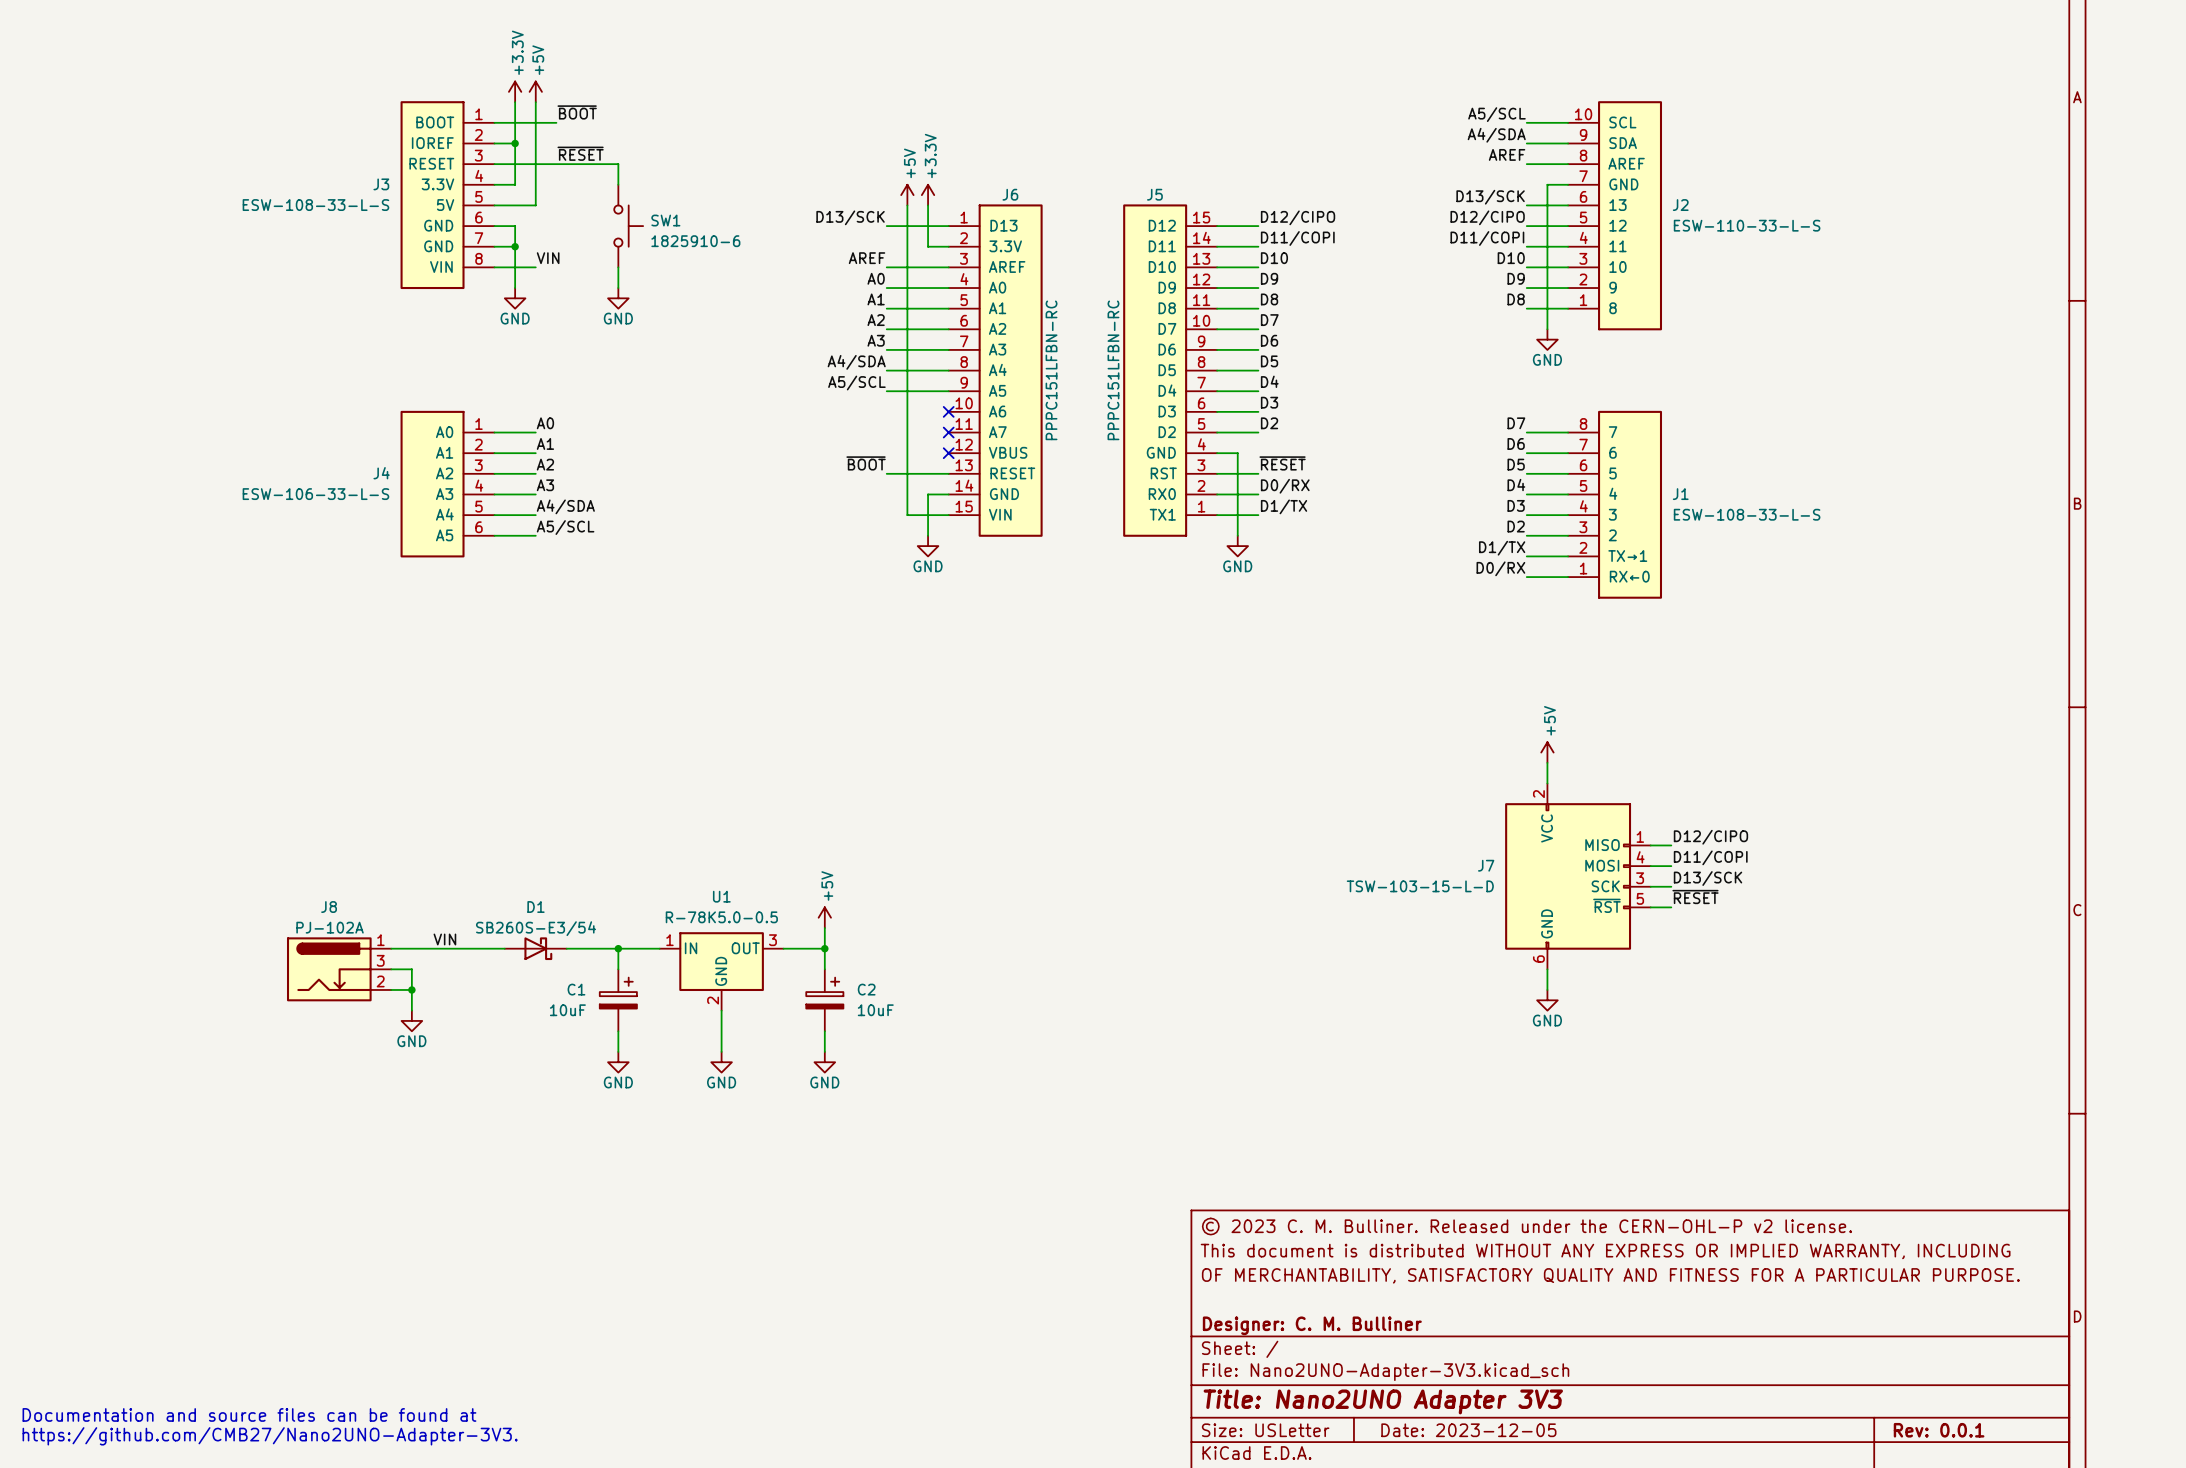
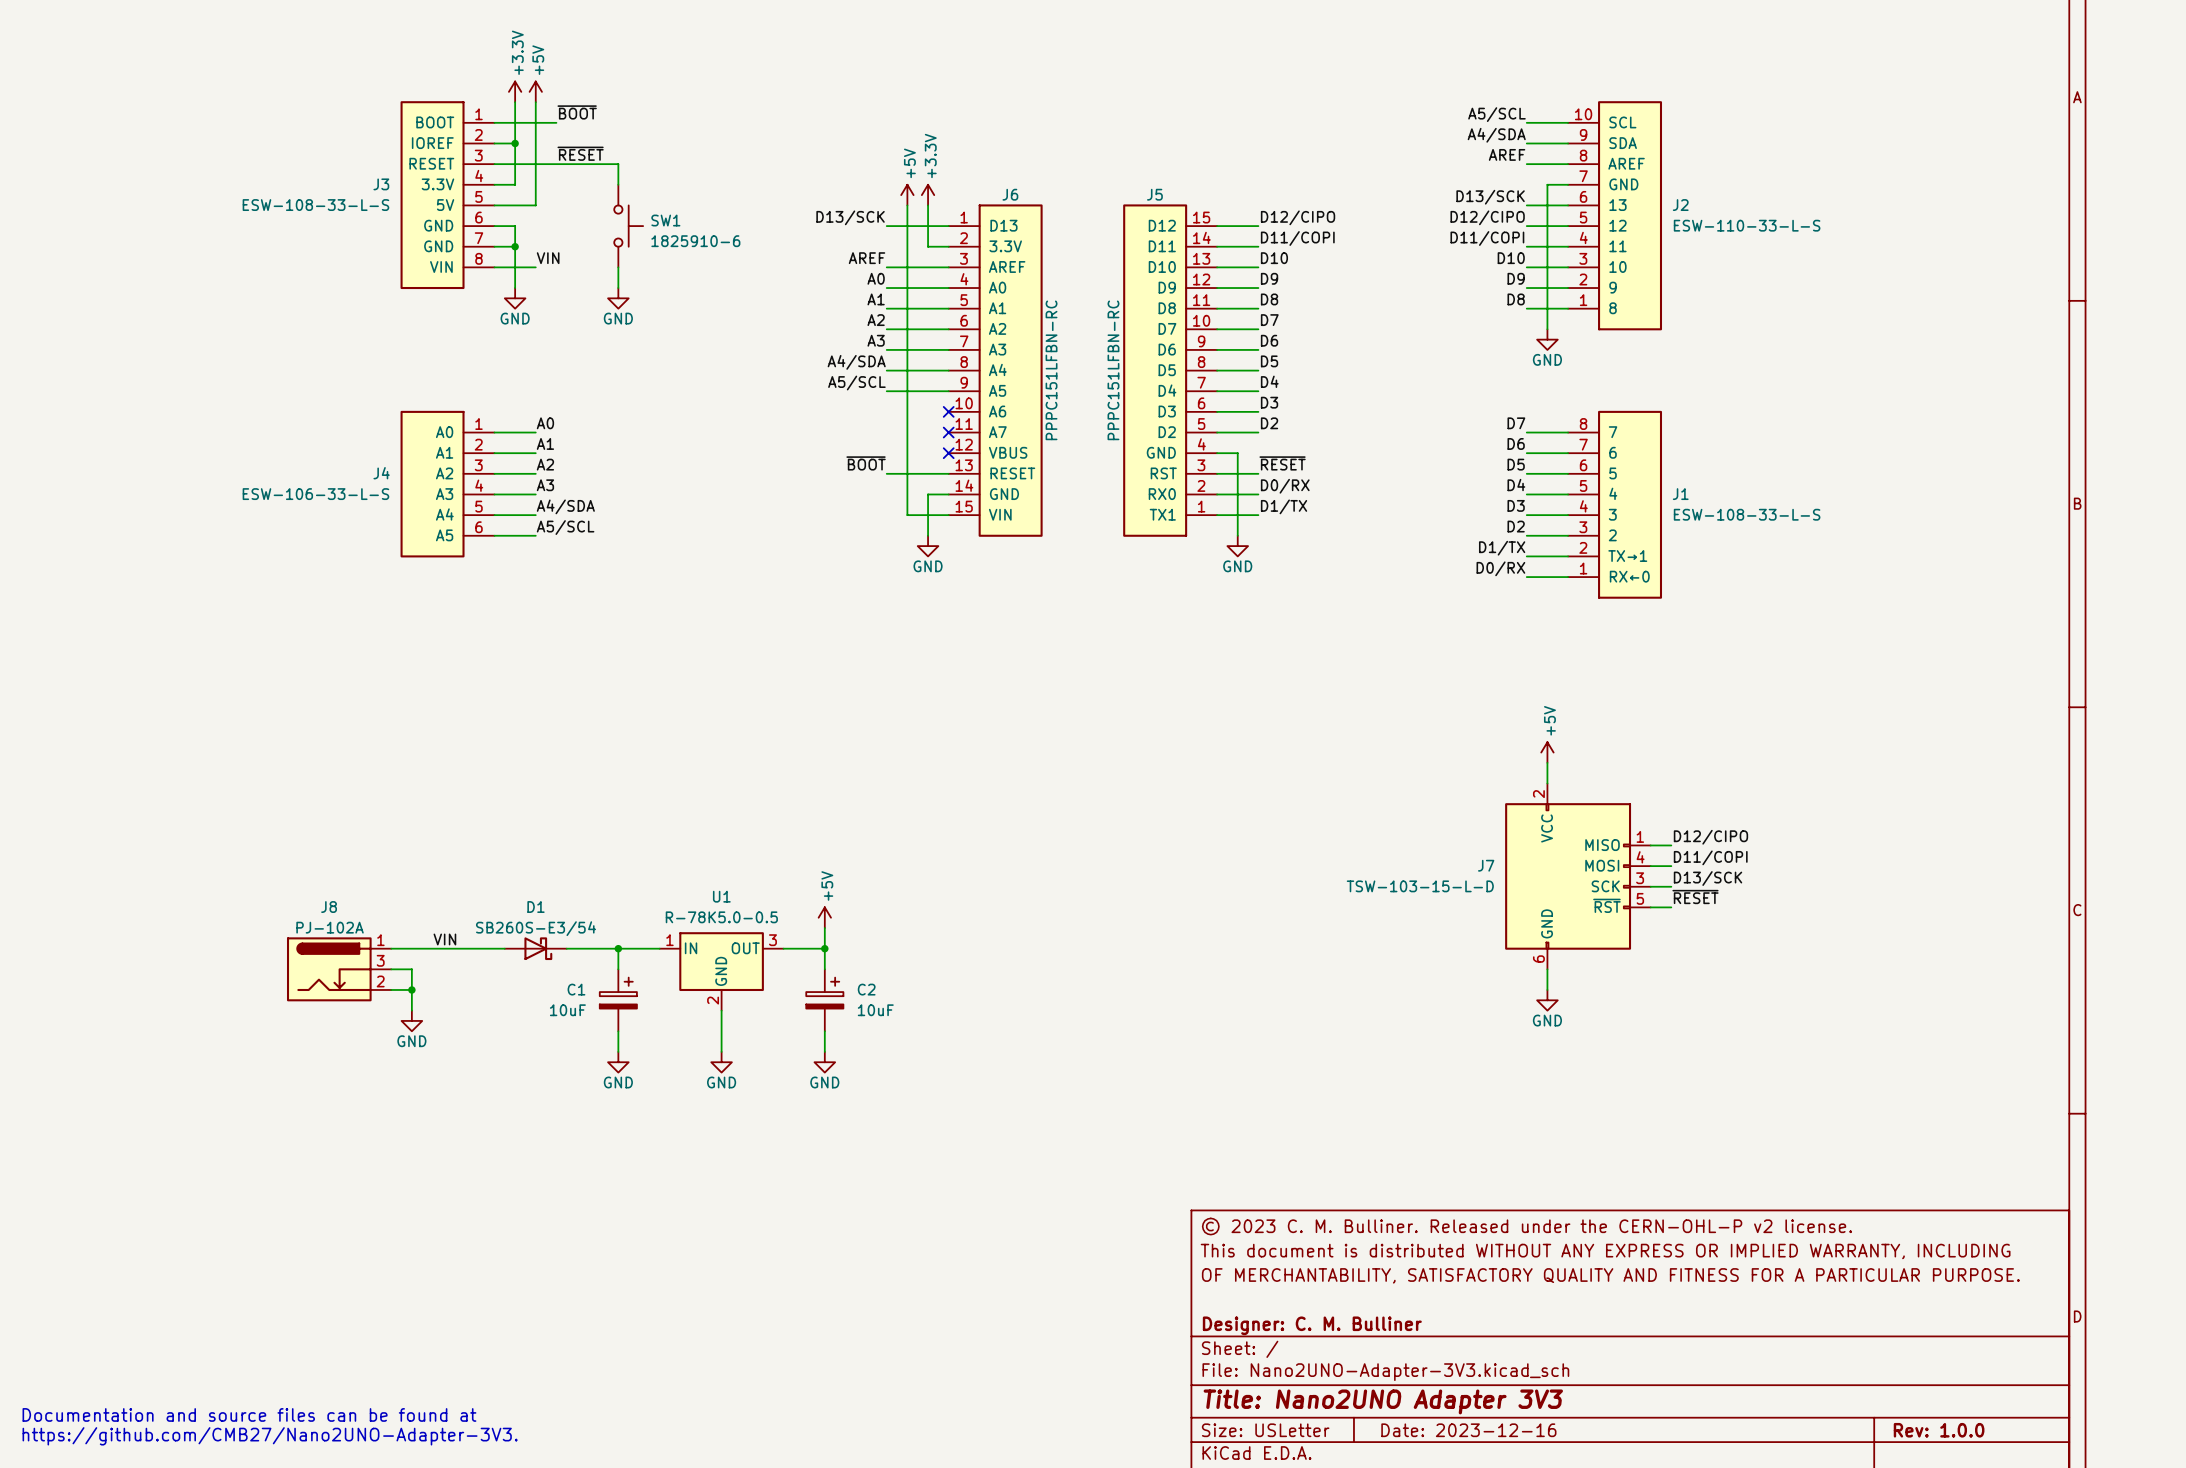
title block: Date: 2023-12-05 (1468, 1430) -> Date: 2023-12-16 (1468, 1430)
title block: Rev: 0.0.1 (1939, 1430) -> Rev: 1.0.0 (1939, 1430)

